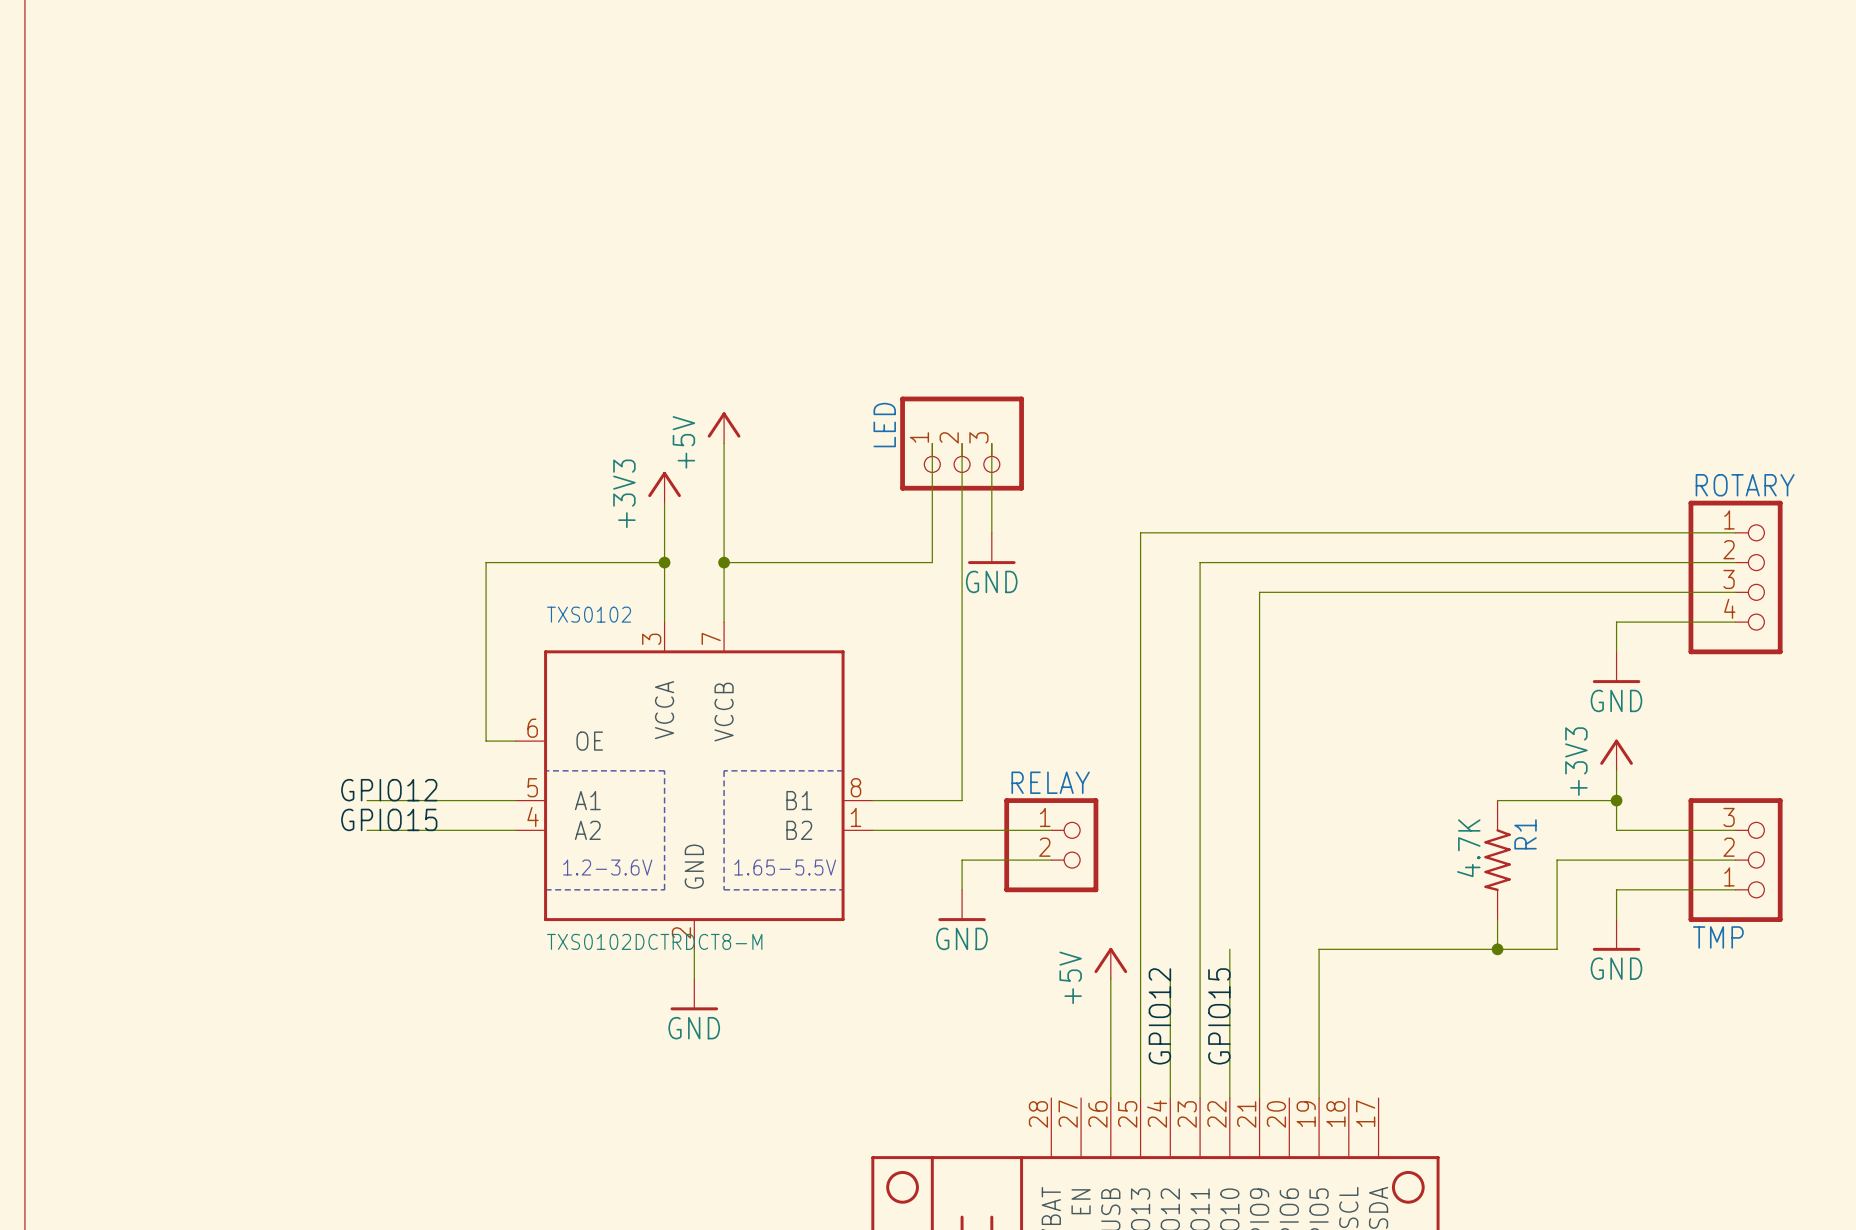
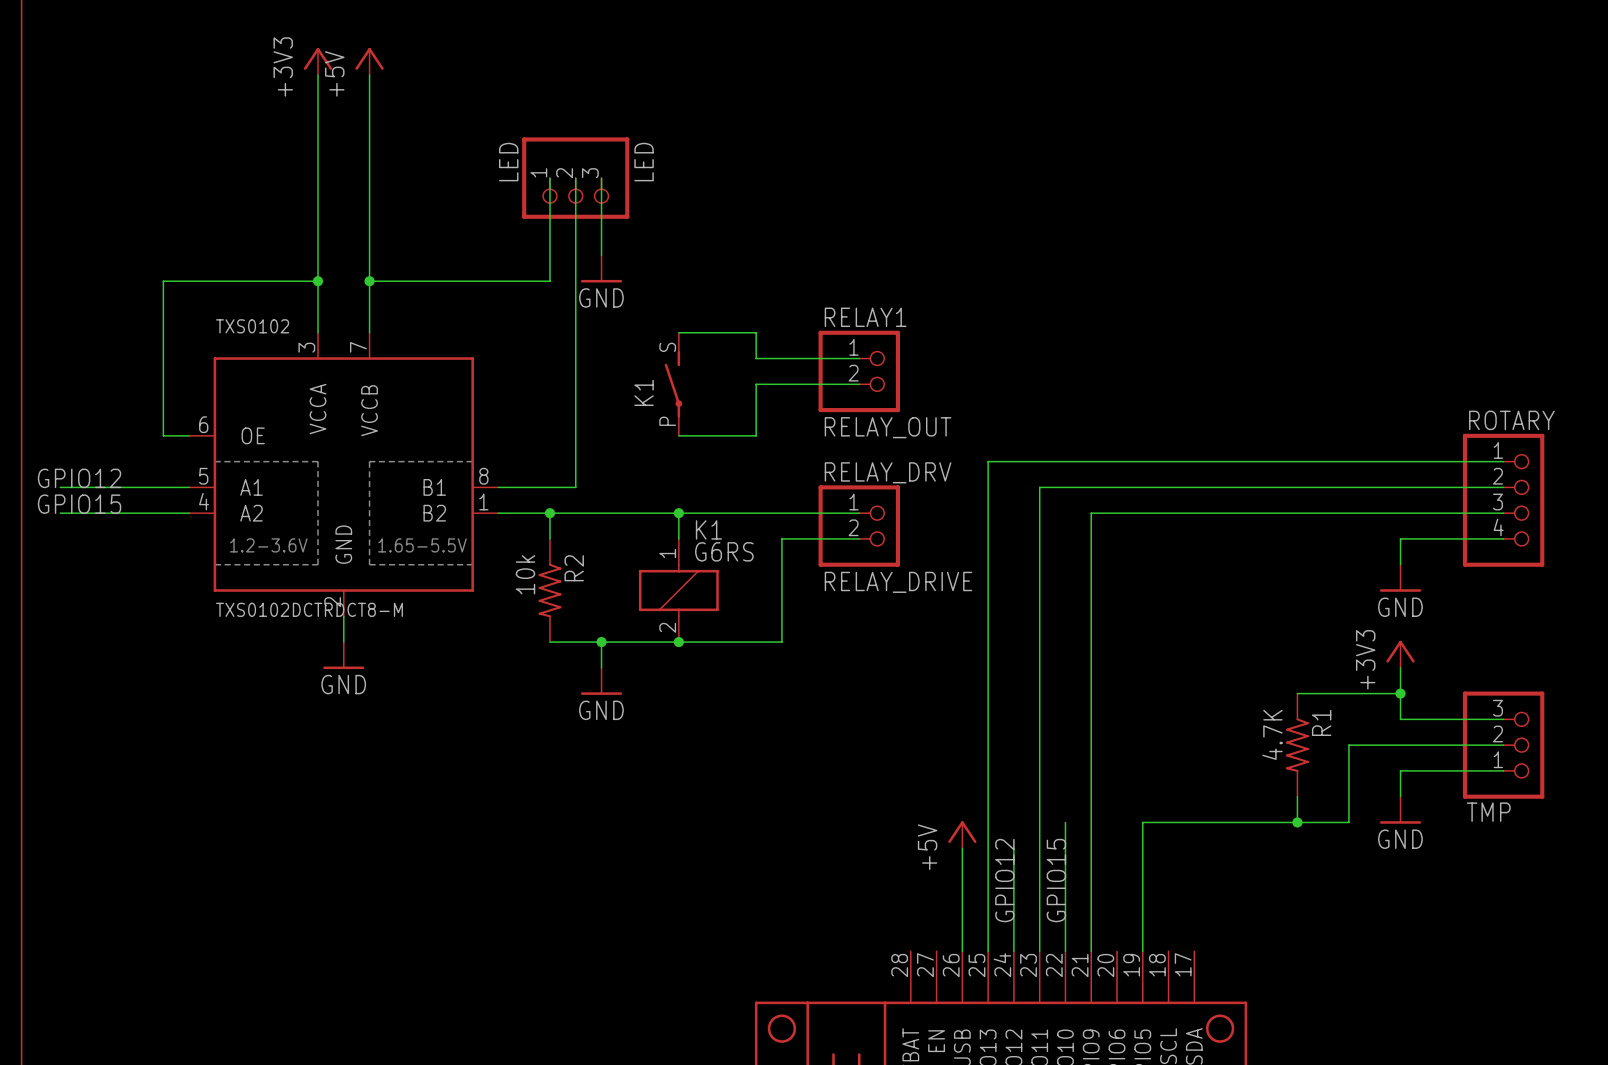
power symbol: none -> +3V3 (318, 61)
power symbol: none -> +5V (369, 61)
wire: none -> (318, 75) (318, 332)
wire: none -> (369, 75) (369, 332)
wire: none -> (549, 178) (549, 281) (369, 281)
wire: none -> (575, 178) (575, 435)
LED: none -> LED (575, 178)
wire: none -> (601, 178) (601, 255)
power symbol: none -> GND (601, 268)
wire: none -> (318, 281) (163, 281) (163, 435) (189, 435)
junction: none -> (318, 281)
junction: none -> (369, 281)
wire: none -> (678, 332) (756, 332) (756, 358) (859, 358)
power symbol: +5V (724, 427) -> none
RELAY1: none -> RELAY_OUT (859, 371)
wire: (724, 443) (724, 622) -> none
K1: none -> (673, 384)
wire: (932, 443) (932, 562) (724, 562) -> none
wire: (962, 443) (962, 800) (872, 800) -> none
LED: (962, 443) -> none
wire: (991, 443) (991, 532) -> (859, 384) (756, 384) (756, 435) (678, 435)
power symbol: +3V3 (664, 487) -> none
power symbol: GND (991, 548) -> none
label: none -> GPIO12 (79, 478)
wire: none -> (60, 487) (189, 487)
wire: (575, 562) (486, 562) (486, 741) (515, 741) -> none
wire: (664, 562) (664, 622) -> none
junction position: (664, 562) -> (549, 513)
junction: (724, 562) -> none
label: none -> GPIO15 (79, 504)
wire: none -> (60, 513) (189, 513)
wire: none -> (498, 513) (859, 513)
wire: none -> (549, 513) (549, 538)
wire: none -> (678, 513) (678, 538)
junction: none -> (678, 513)
RELAY_DRV: none -> RELAY_DRIVE (859, 526)
wire: none -> (859, 538) (781, 538) (781, 642) (549, 642)
R2: none -> 10k (549, 590)
K1: none -> G6RS (678, 590)
wire: none -> (343, 616) (343, 642)
junction: none -> (601, 642)
junction: none -> (678, 642)
power symbol: none -> GND (343, 655)
TXS0102 position: (694, 785) -> (343, 474)
power symbol: none -> GND (601, 681)
label: GPIO12 (389, 790) -> none
wire: (367, 800) (515, 800) -> none
label: GPIO15 (389, 819) -> none
wire: (367, 830) (515, 830) -> none
wire: (872, 830) (1051, 830) -> none
RELAY: (1051, 845) -> none
wire: (1051, 860) (962, 860) (962, 889) -> none
power symbol: GND (962, 905) -> none
wire: (694, 949) (694, 979) -> (601, 642) (601, 667)
power symbol: GND (694, 994) -> none

